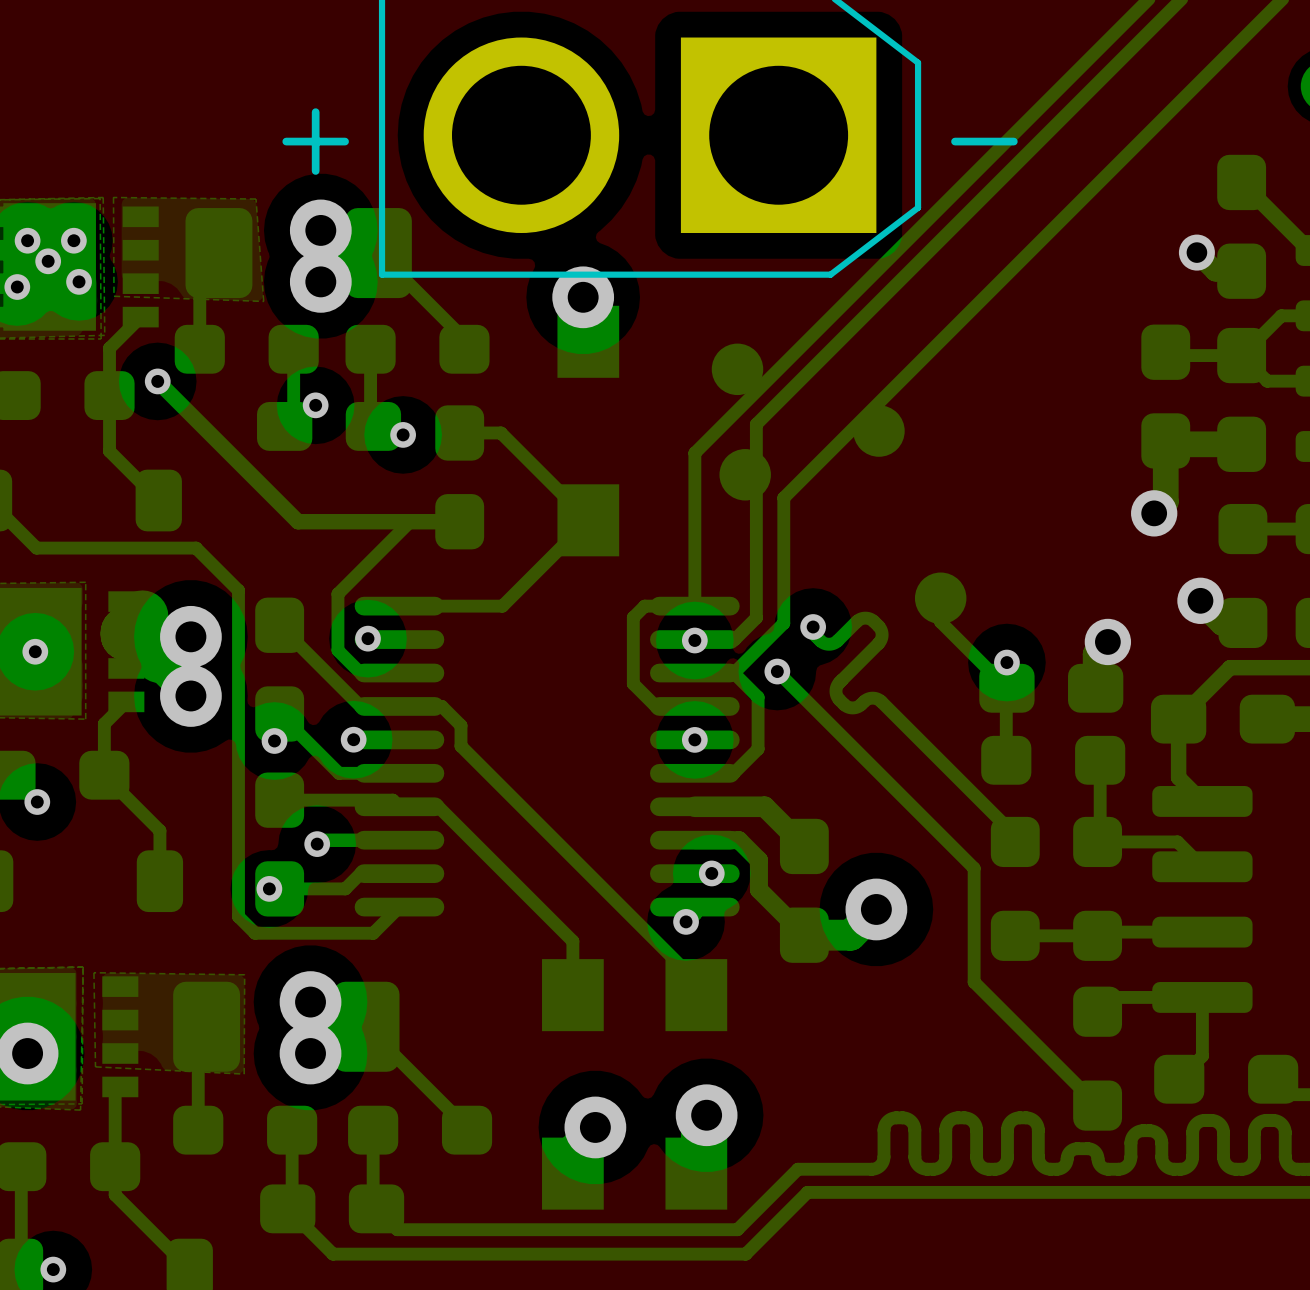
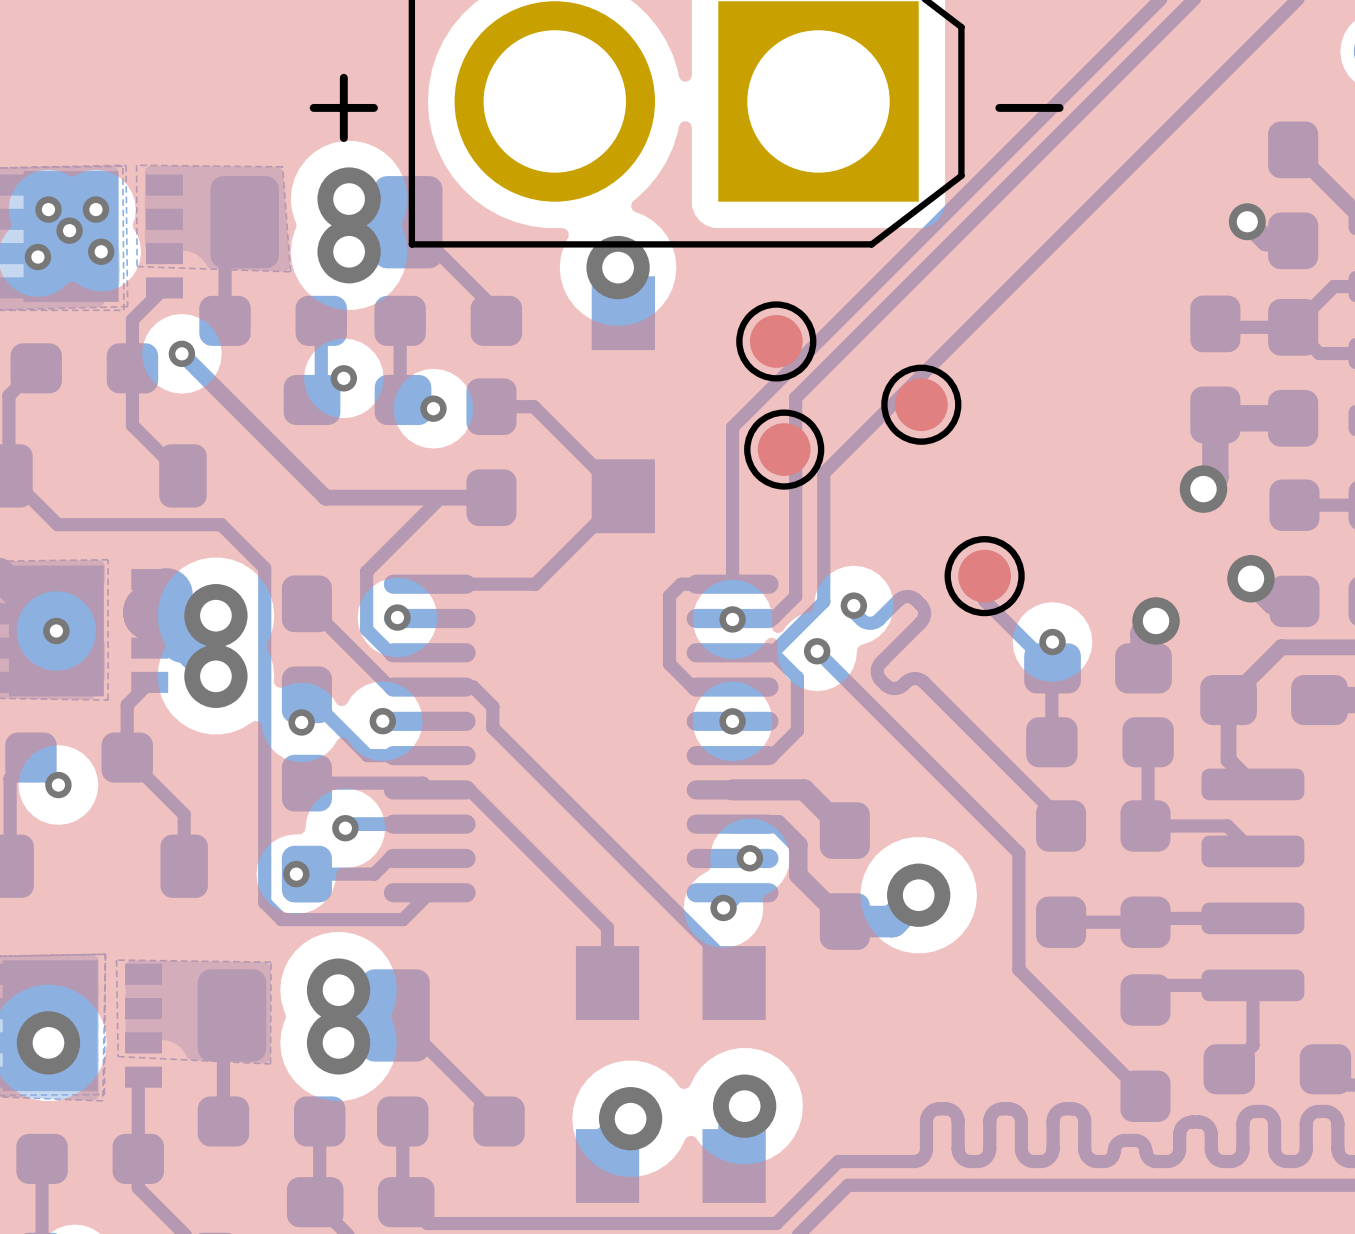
part side: bottom (737, 369) -> top (776, 341)
part side: bottom (878, 431) -> top (921, 404)
part side: bottom (745, 474) -> top (784, 449)
part side: bottom (940, 598) -> top (984, 576)

